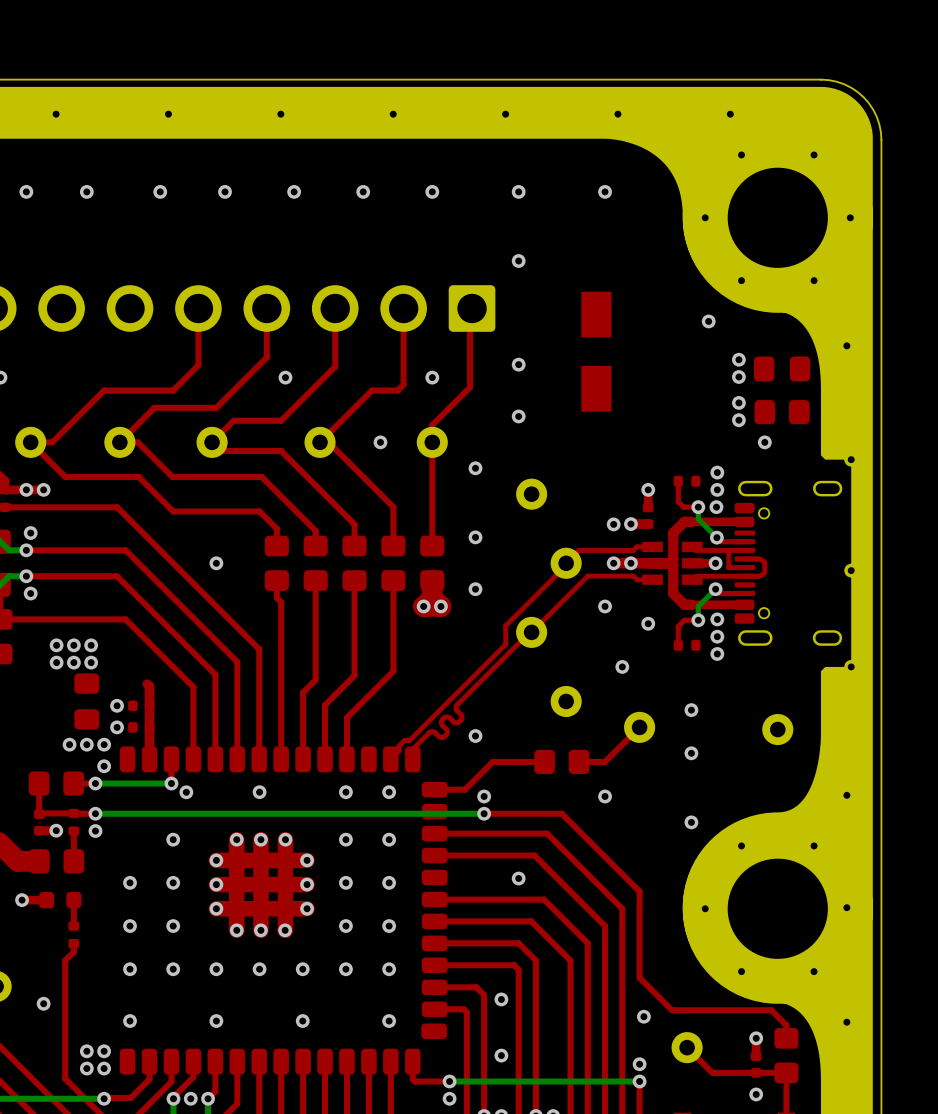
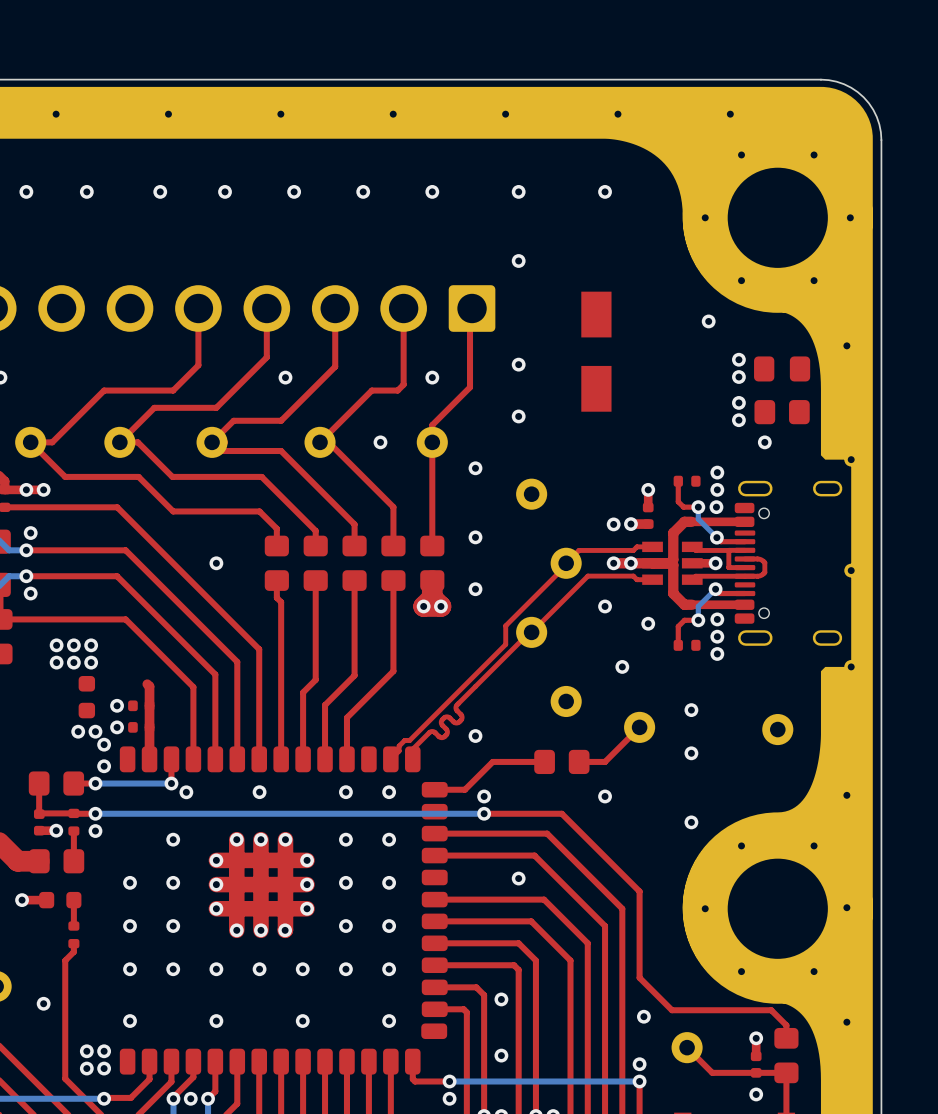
part footprint: [74, 673, 100, 730] -> [78, 676, 96, 719]
via: none -> (78, 731)
via: none -> (95, 731)
via: (69, 744) -> none
via: (86, 744) -> none

